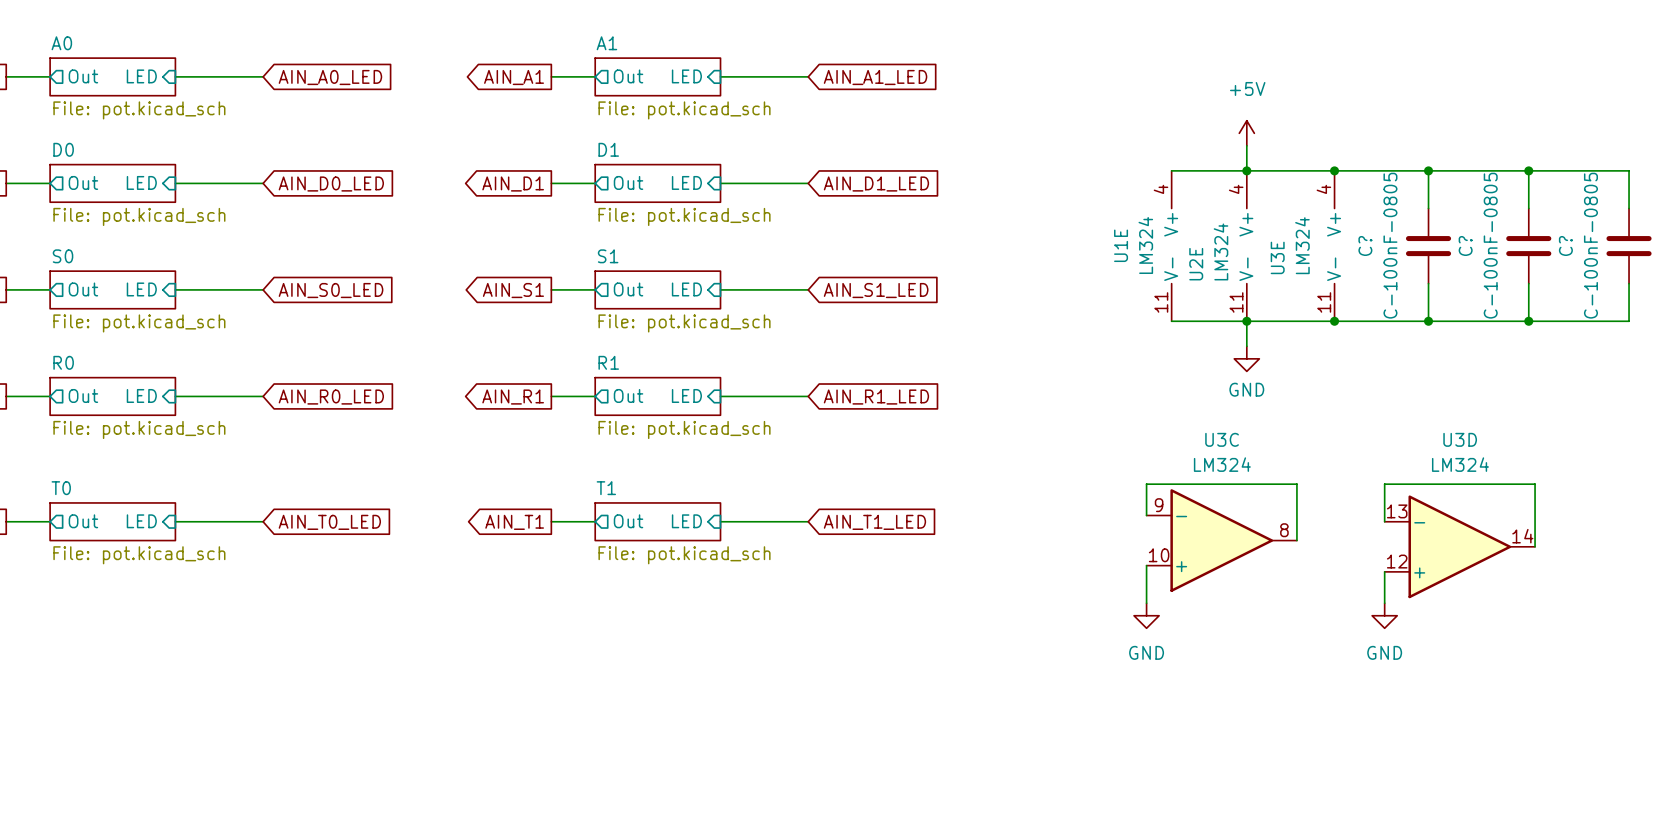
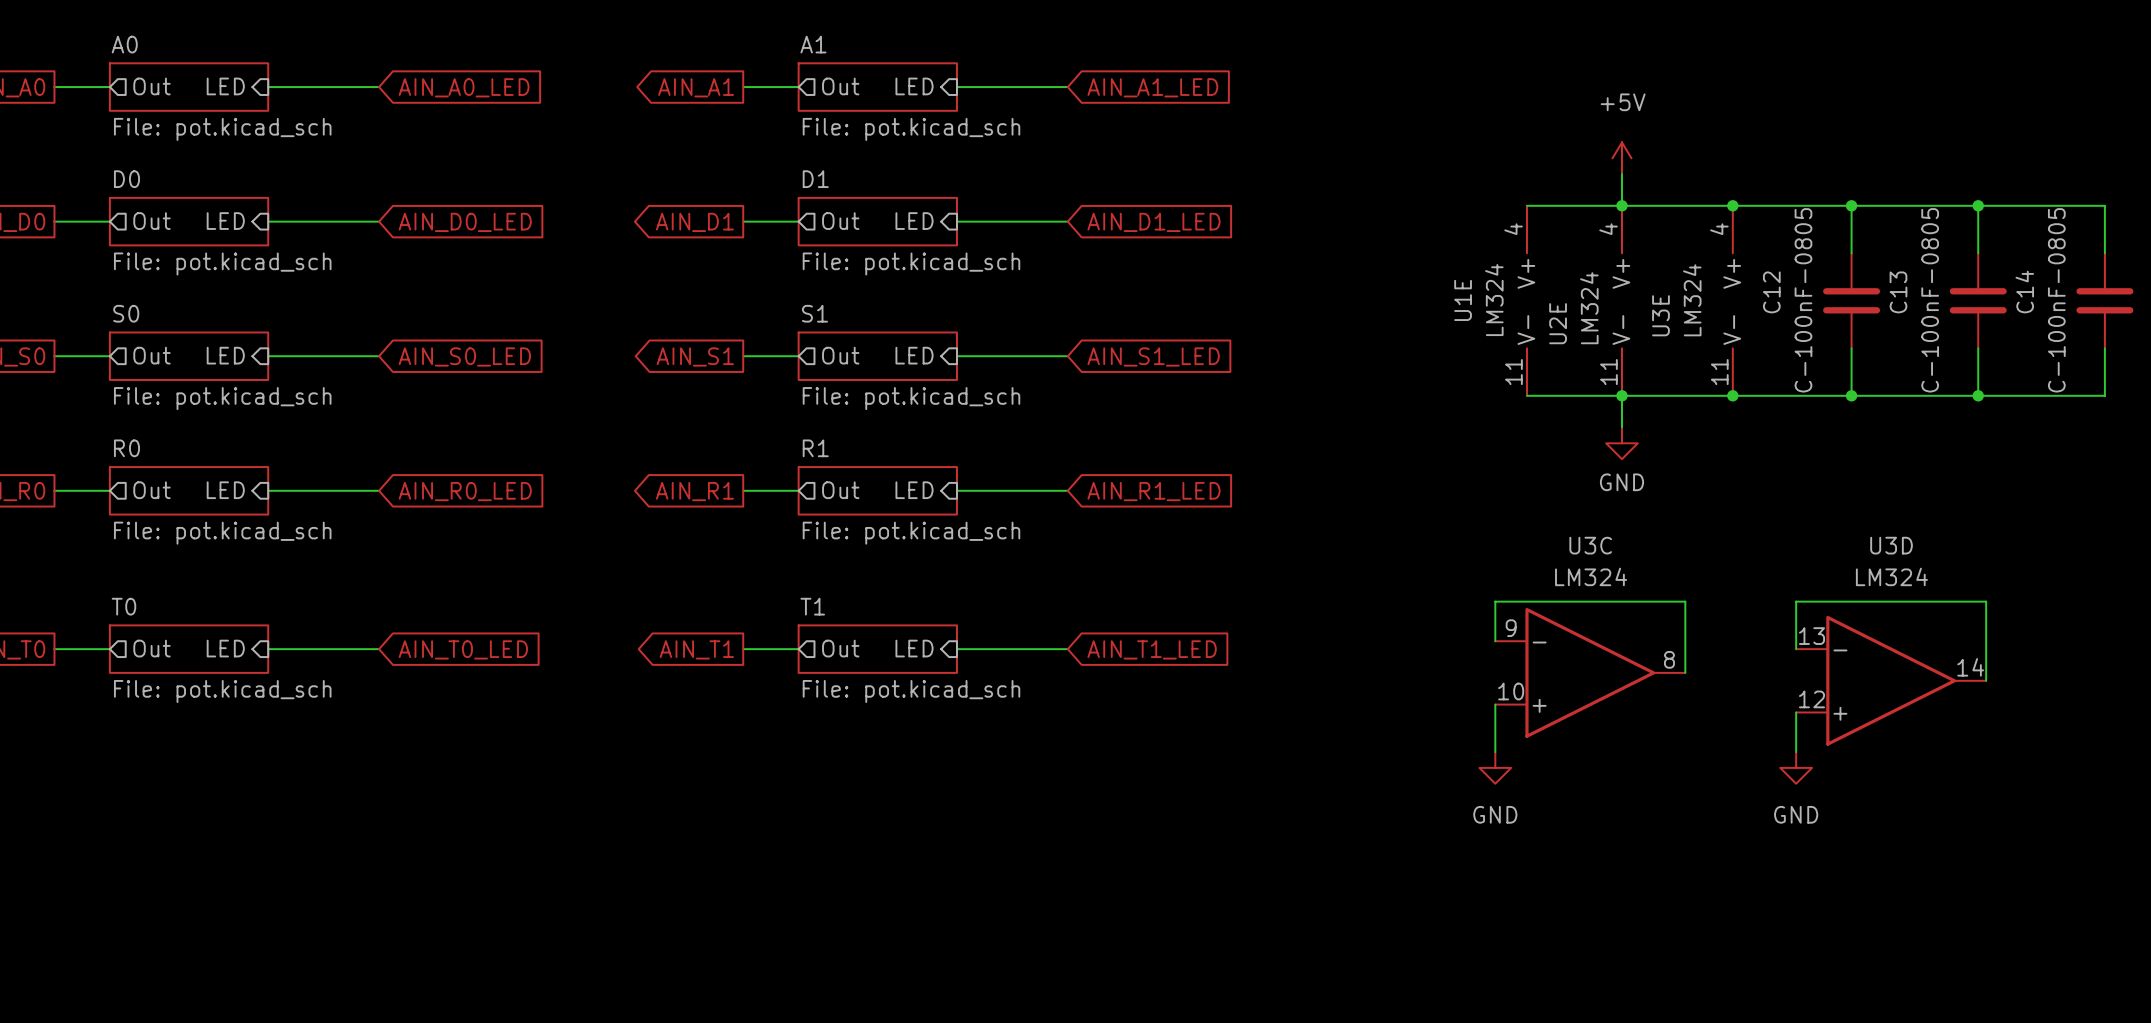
C? name: C? (1365, 245) -> C12 (1771, 292)
C? name: C? (1465, 245) -> C13 (1898, 292)
C? name: C? (1565, 245) -> C14 (2024, 292)

